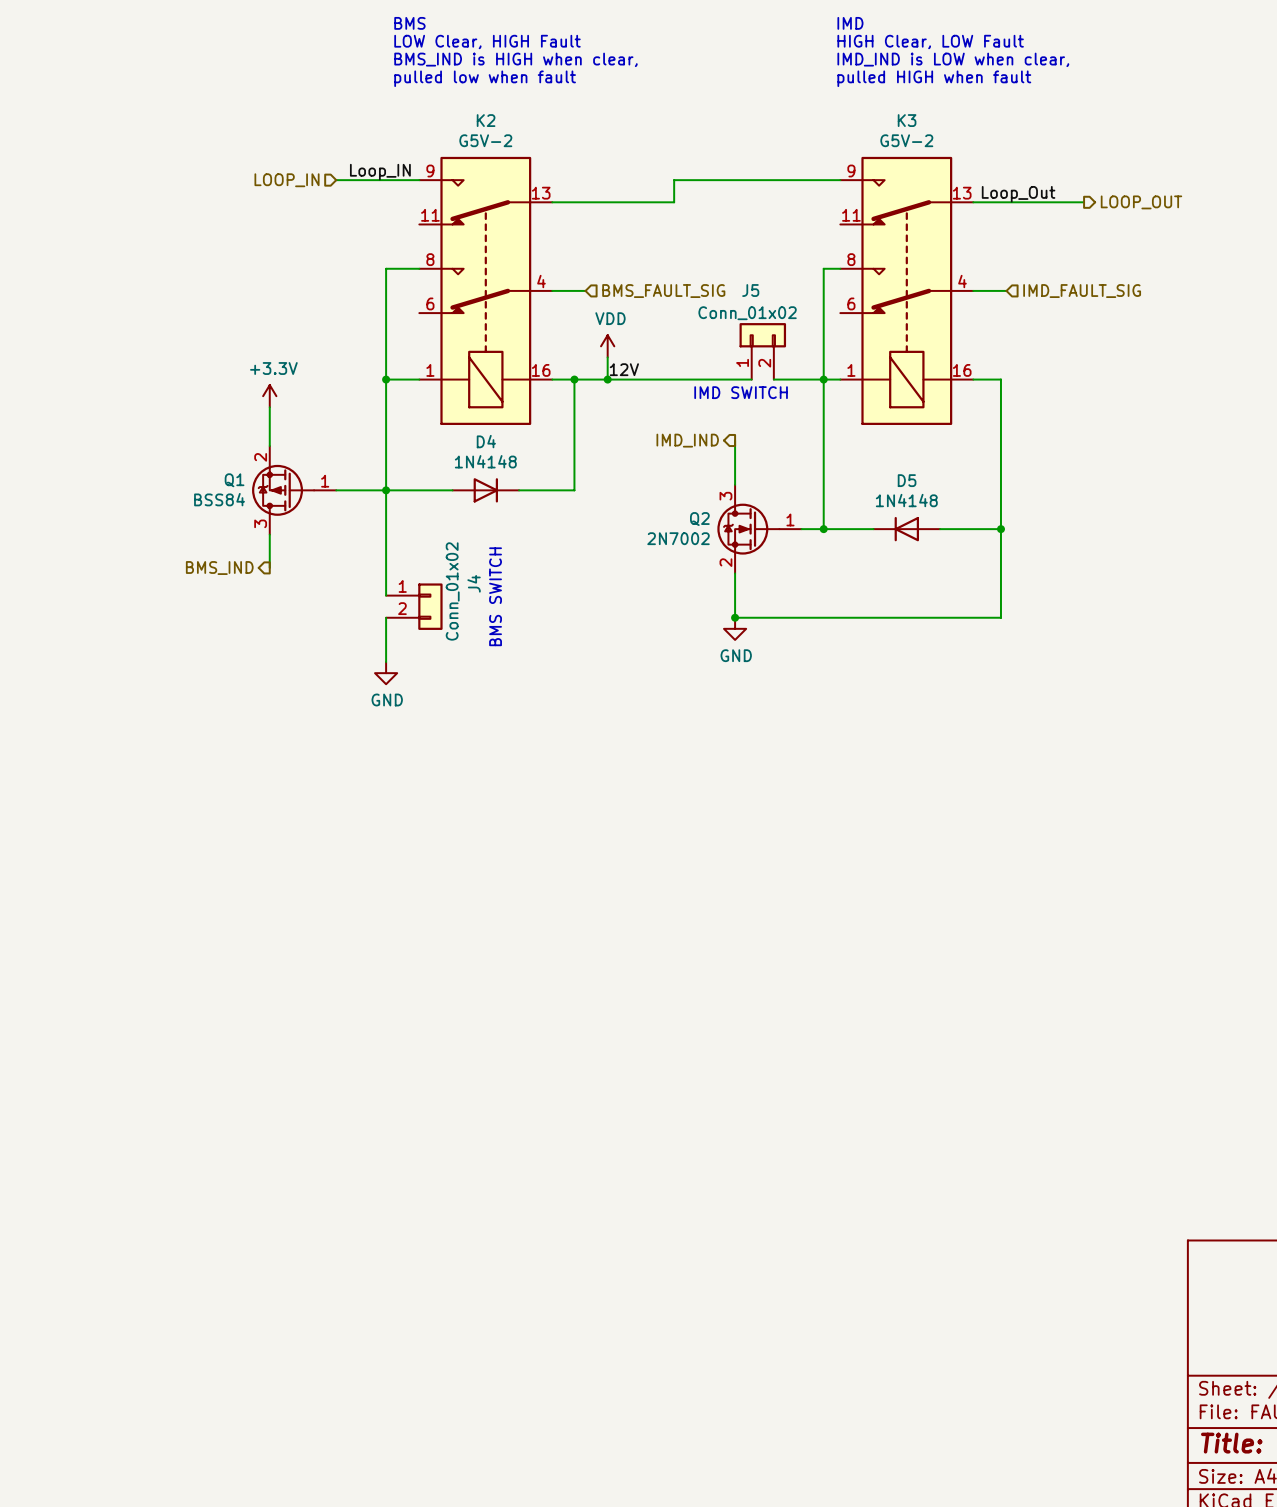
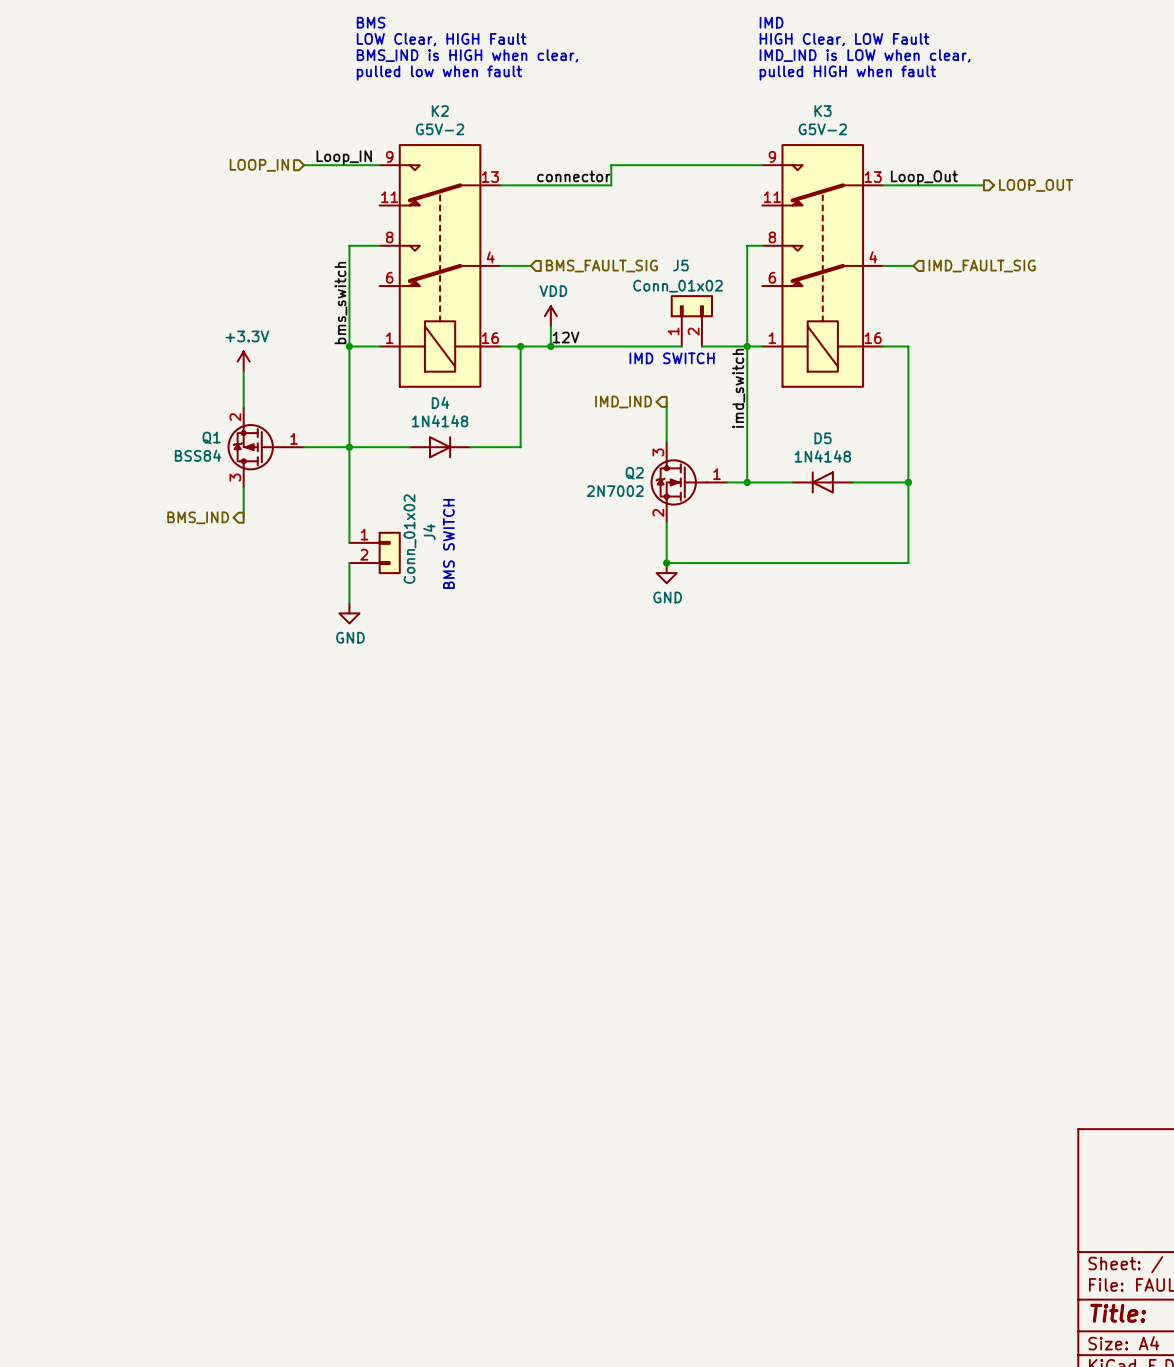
label: none -> connector (573, 176)
label: none -> bms_switch (340, 303)
label: none -> imd_switch (738, 388)

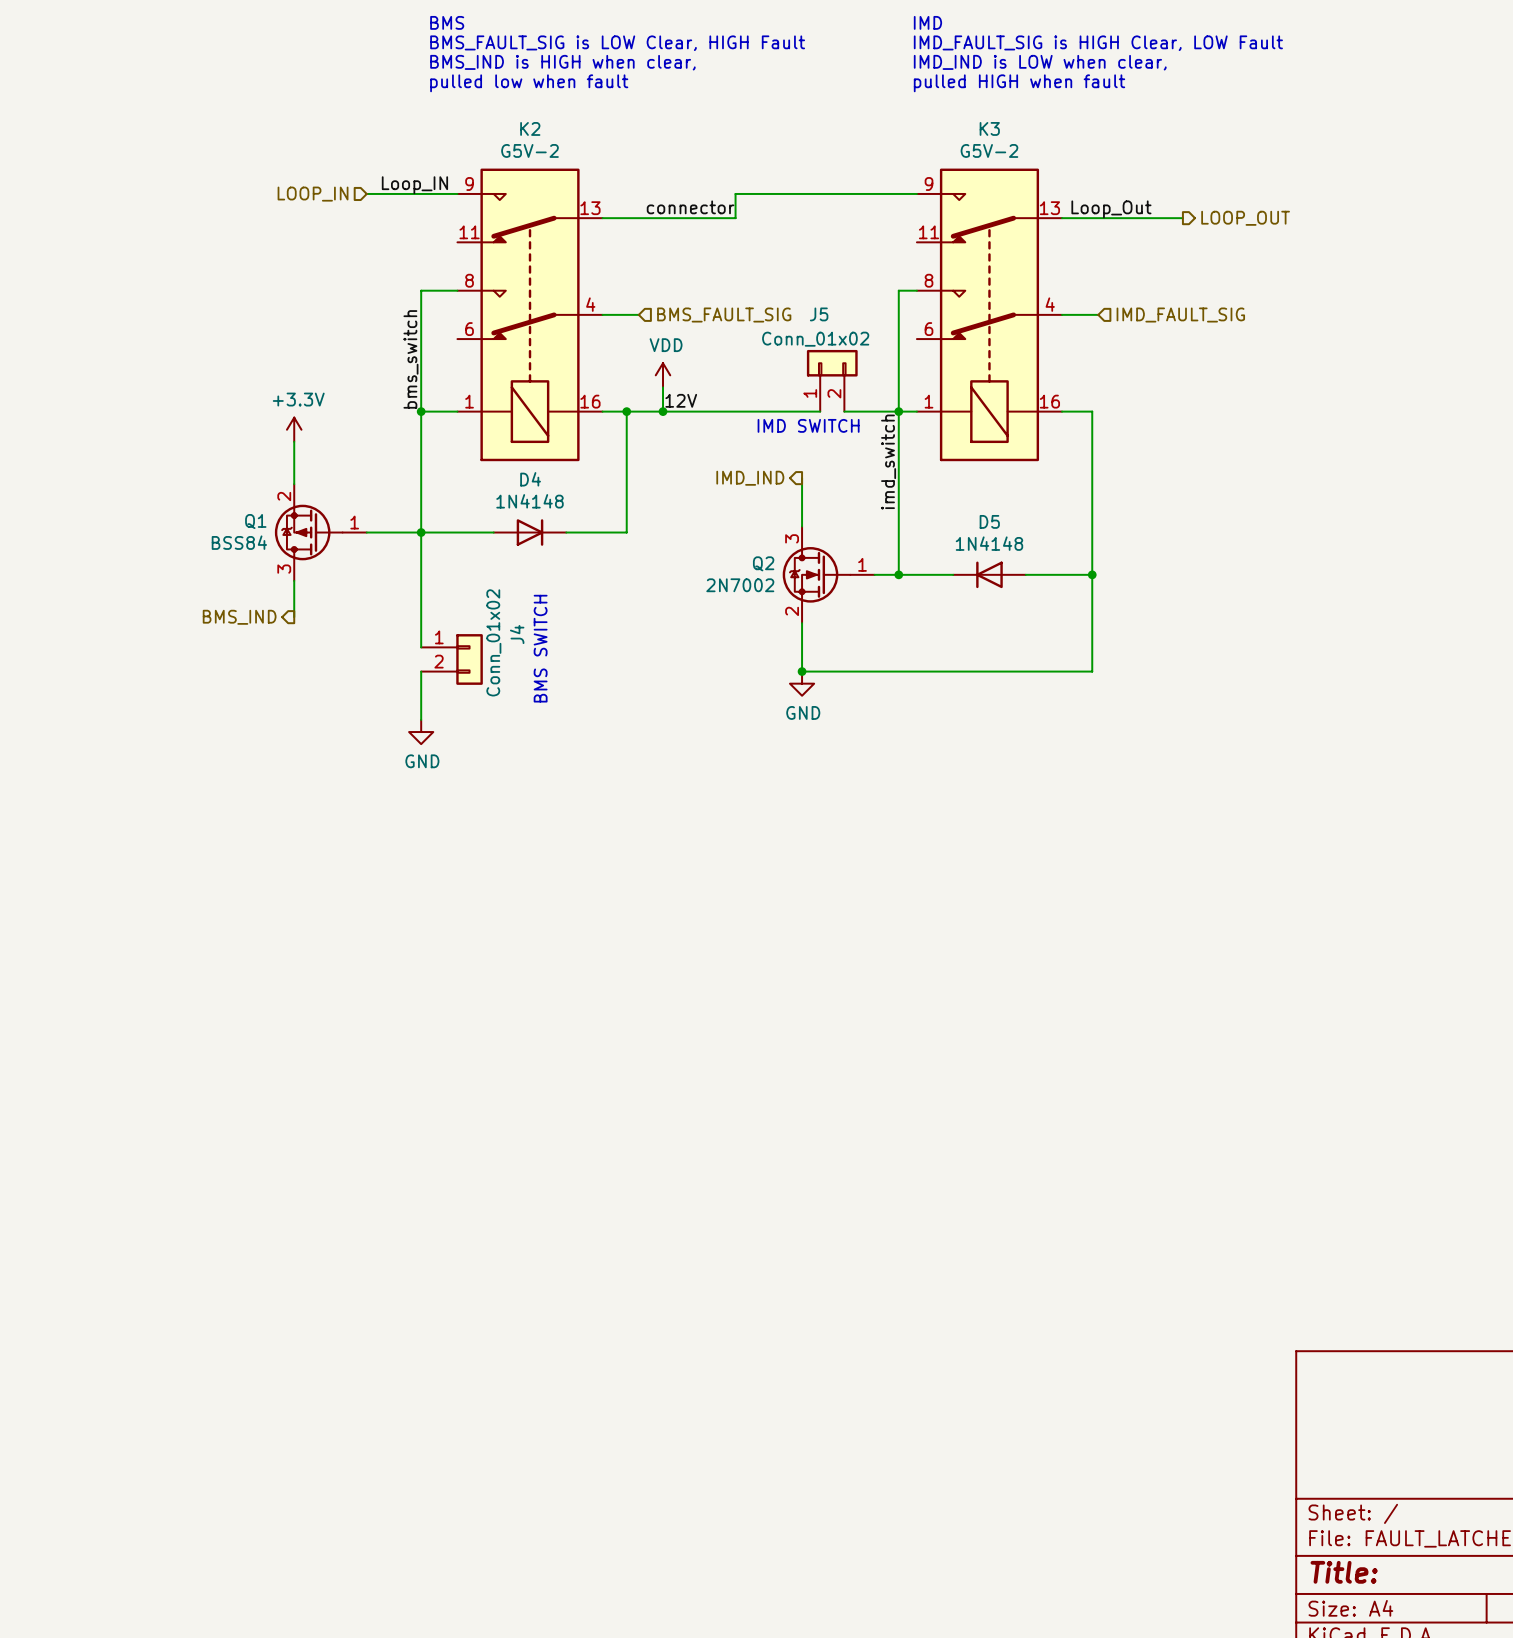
text: LOW Clear, HIGH Fault (441, 39) -> BMS_FAULT_SIG is LOW Clear, HIGH Fault (617, 43)
text: HIGH Clear, LOW Fault (844, 39) -> IMD_FAULT_SIG is HIGH Clear, LOW Fault (1098, 43)

